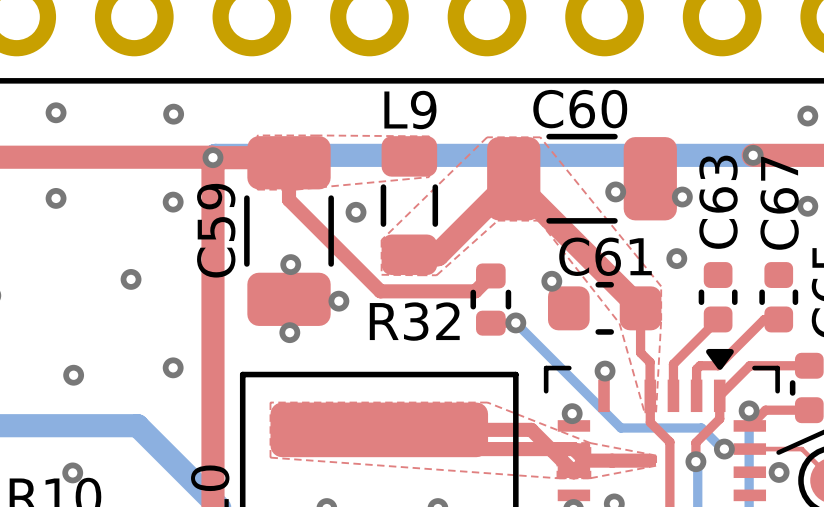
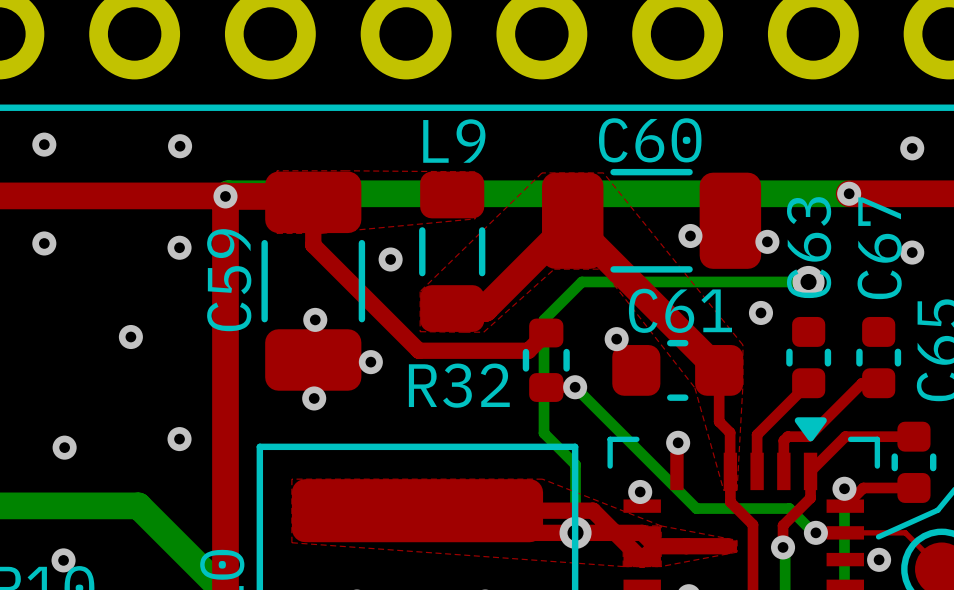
bottom track: none -> (808, 281) (581, 281) (544, 319) (544, 433) (575, 464) (575, 532)
via: none -> (808, 281)
via: none -> (575, 532)

